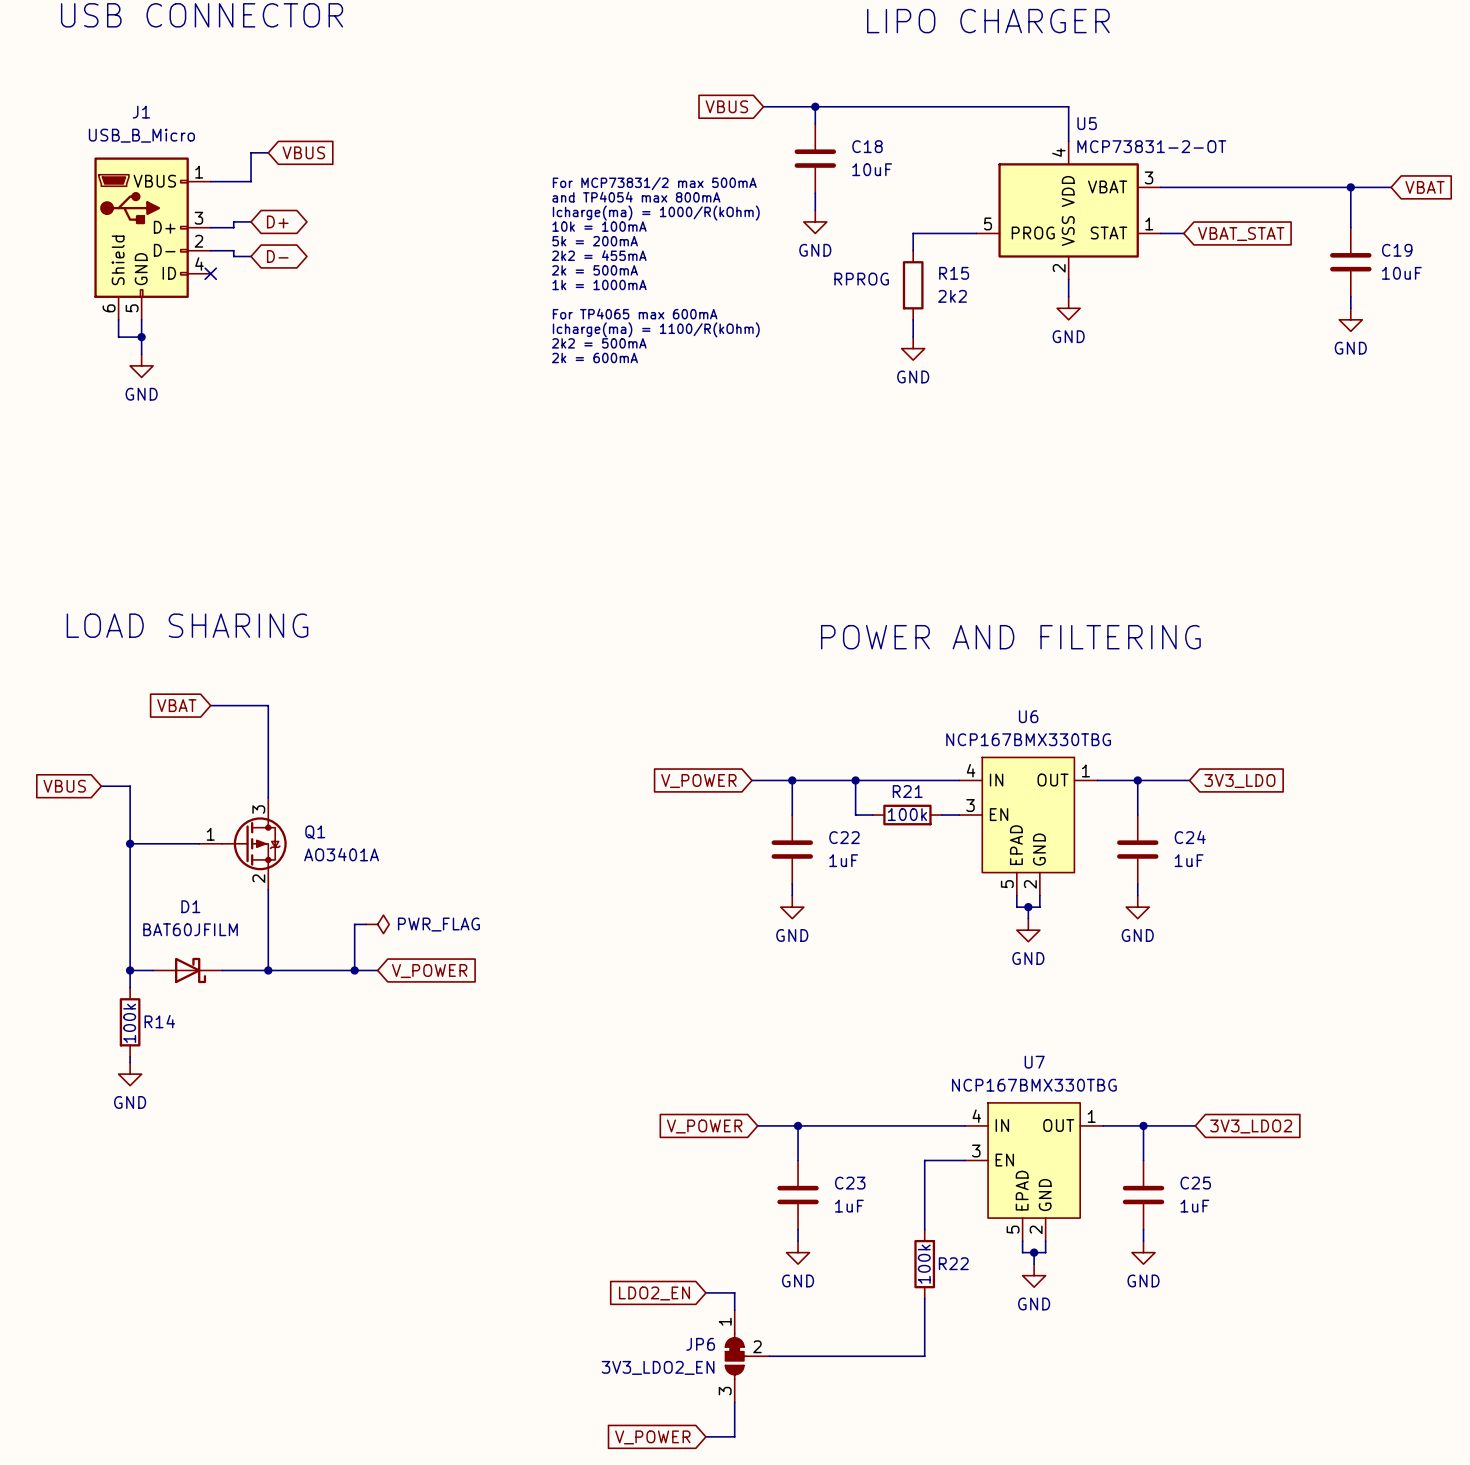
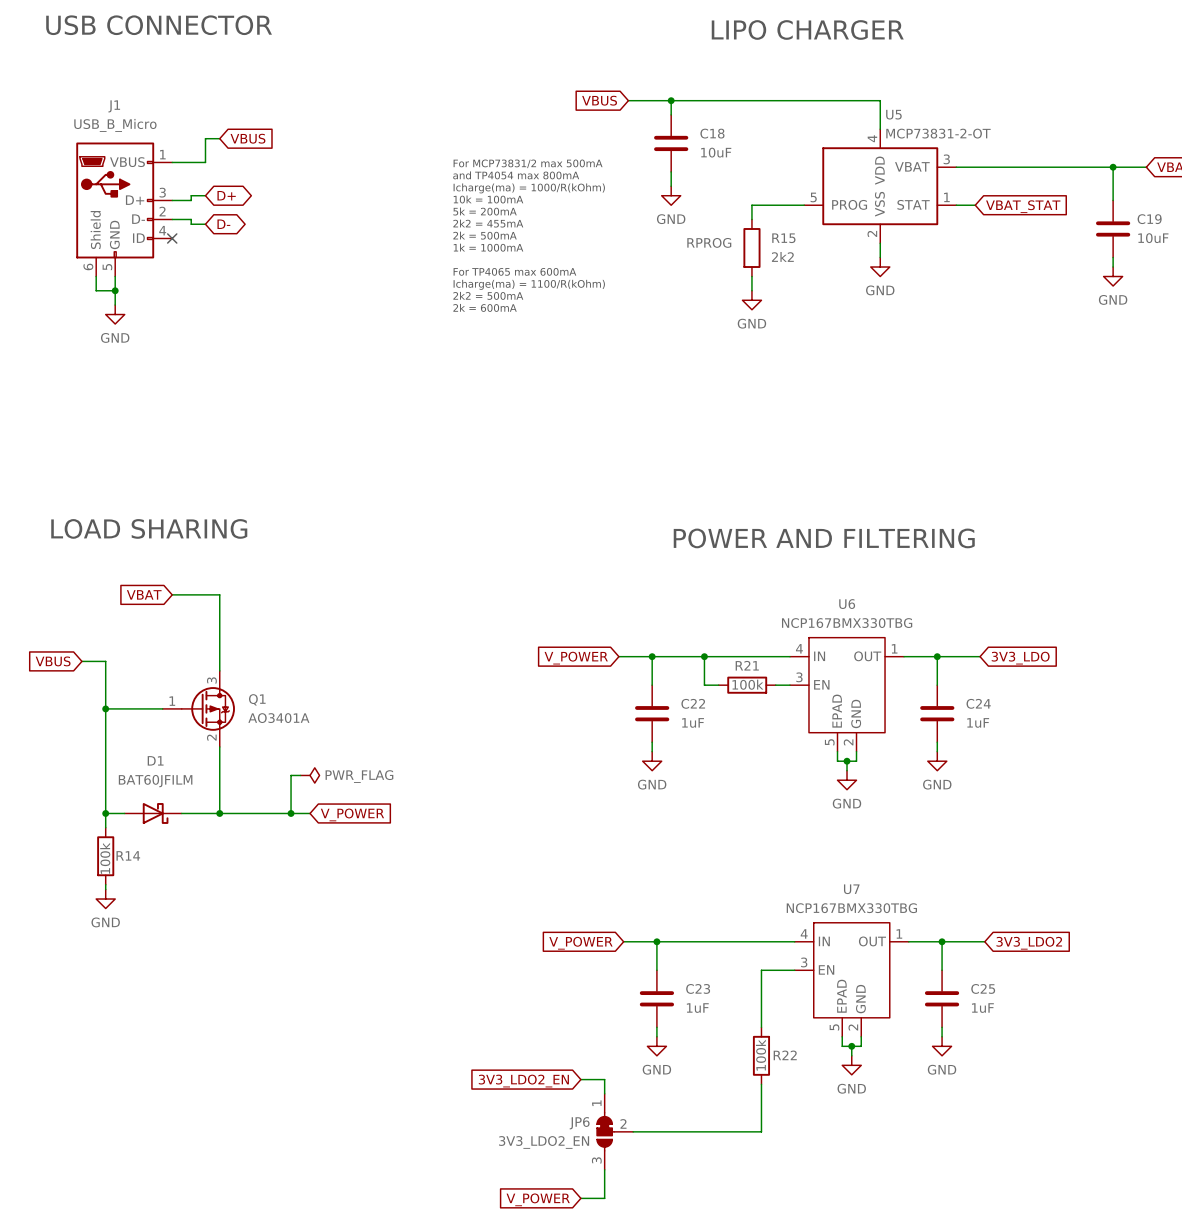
global label: LDO2_EN (654, 1293) -> 3V3_LDO2_EN (523, 1081)

